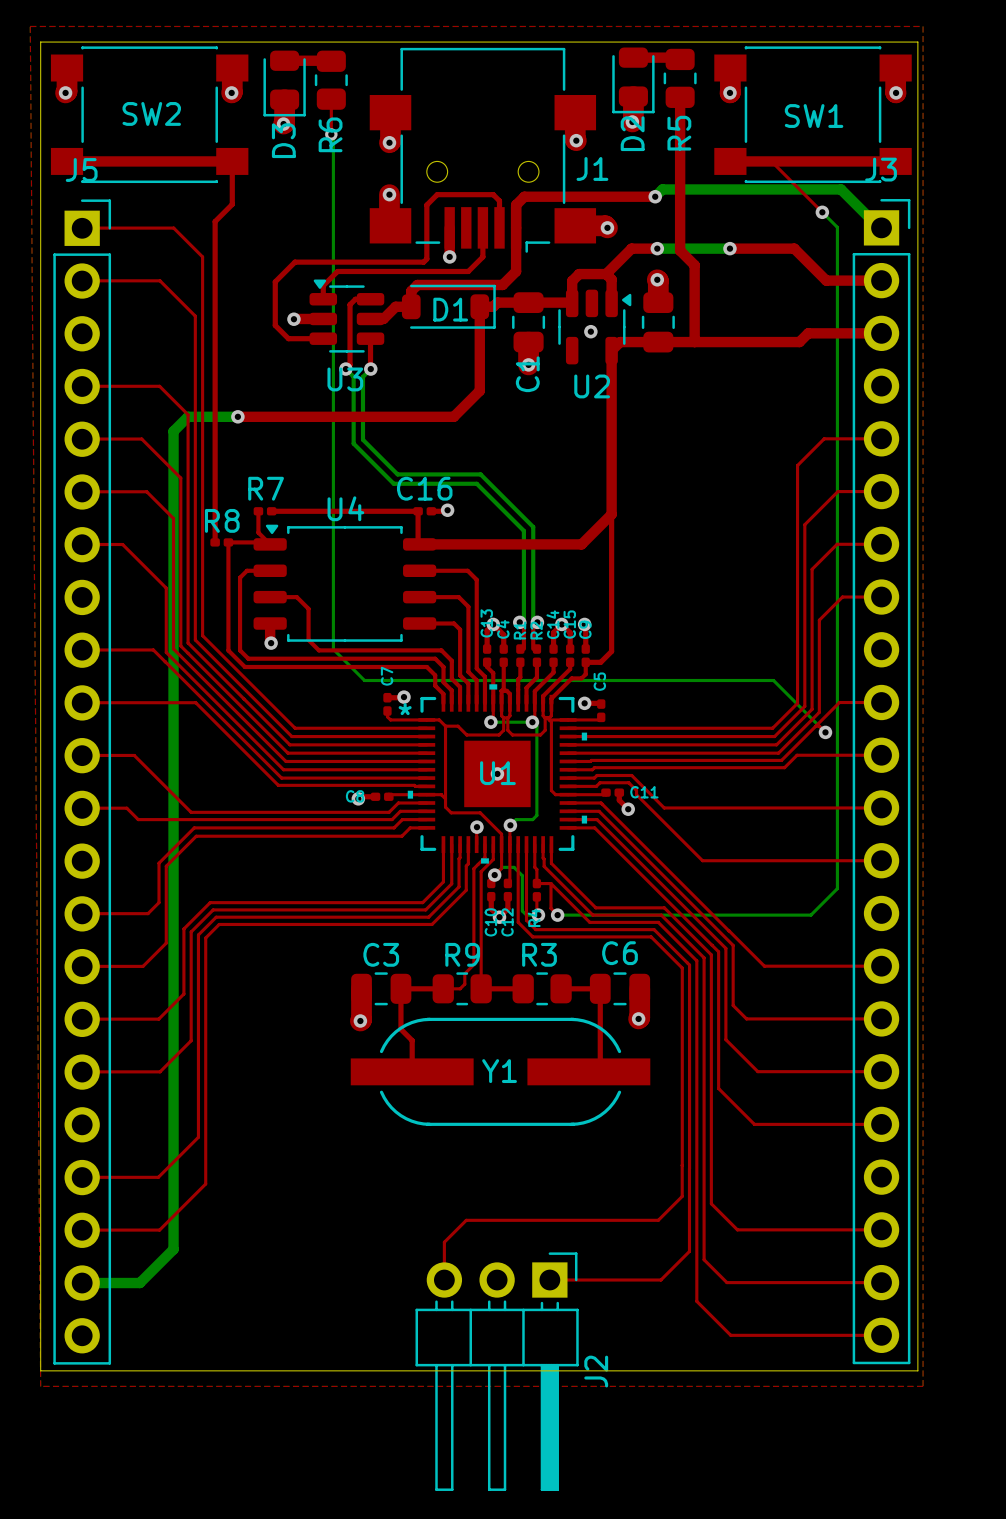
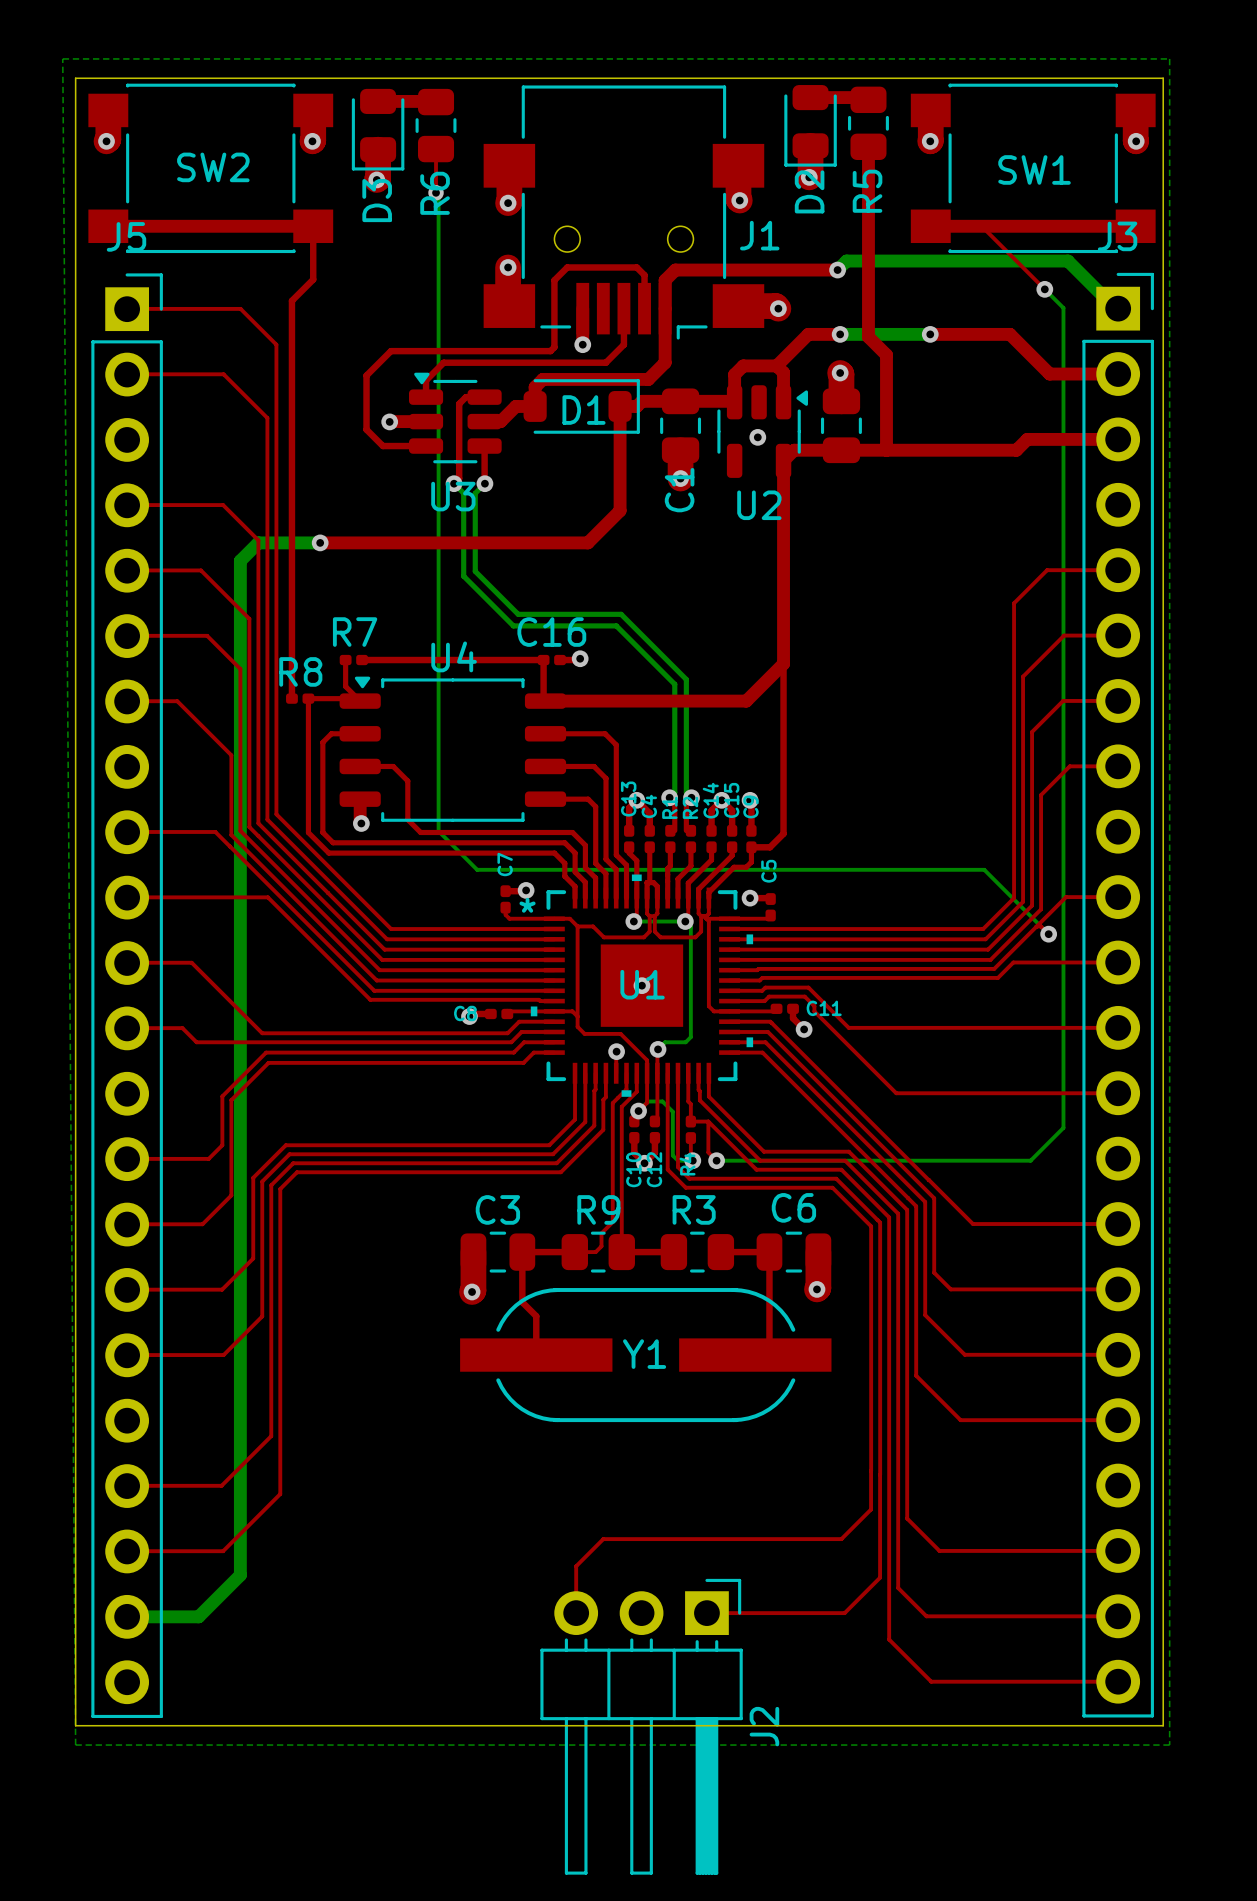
top zone outline: (30, 26) (923, 26) (923, 1386) (40, 1386) (30, 26) -> none

